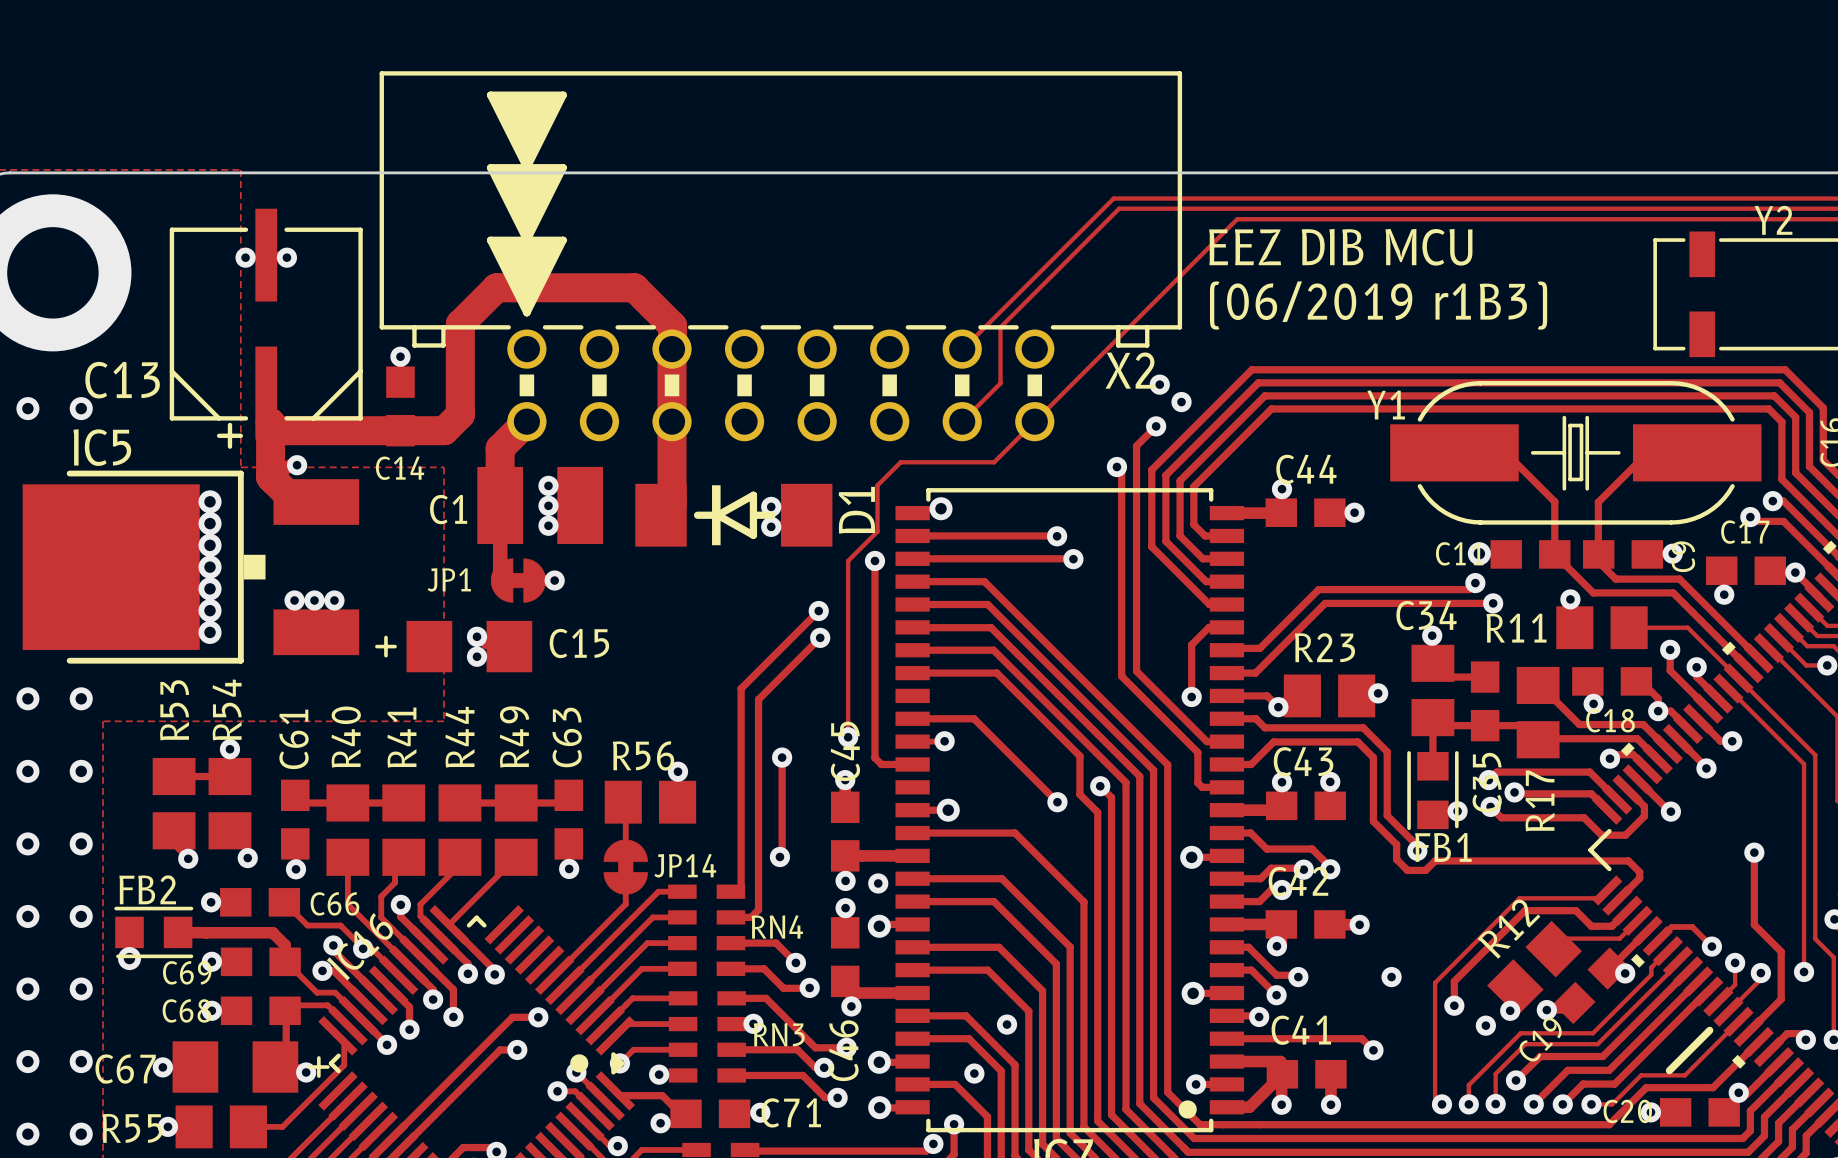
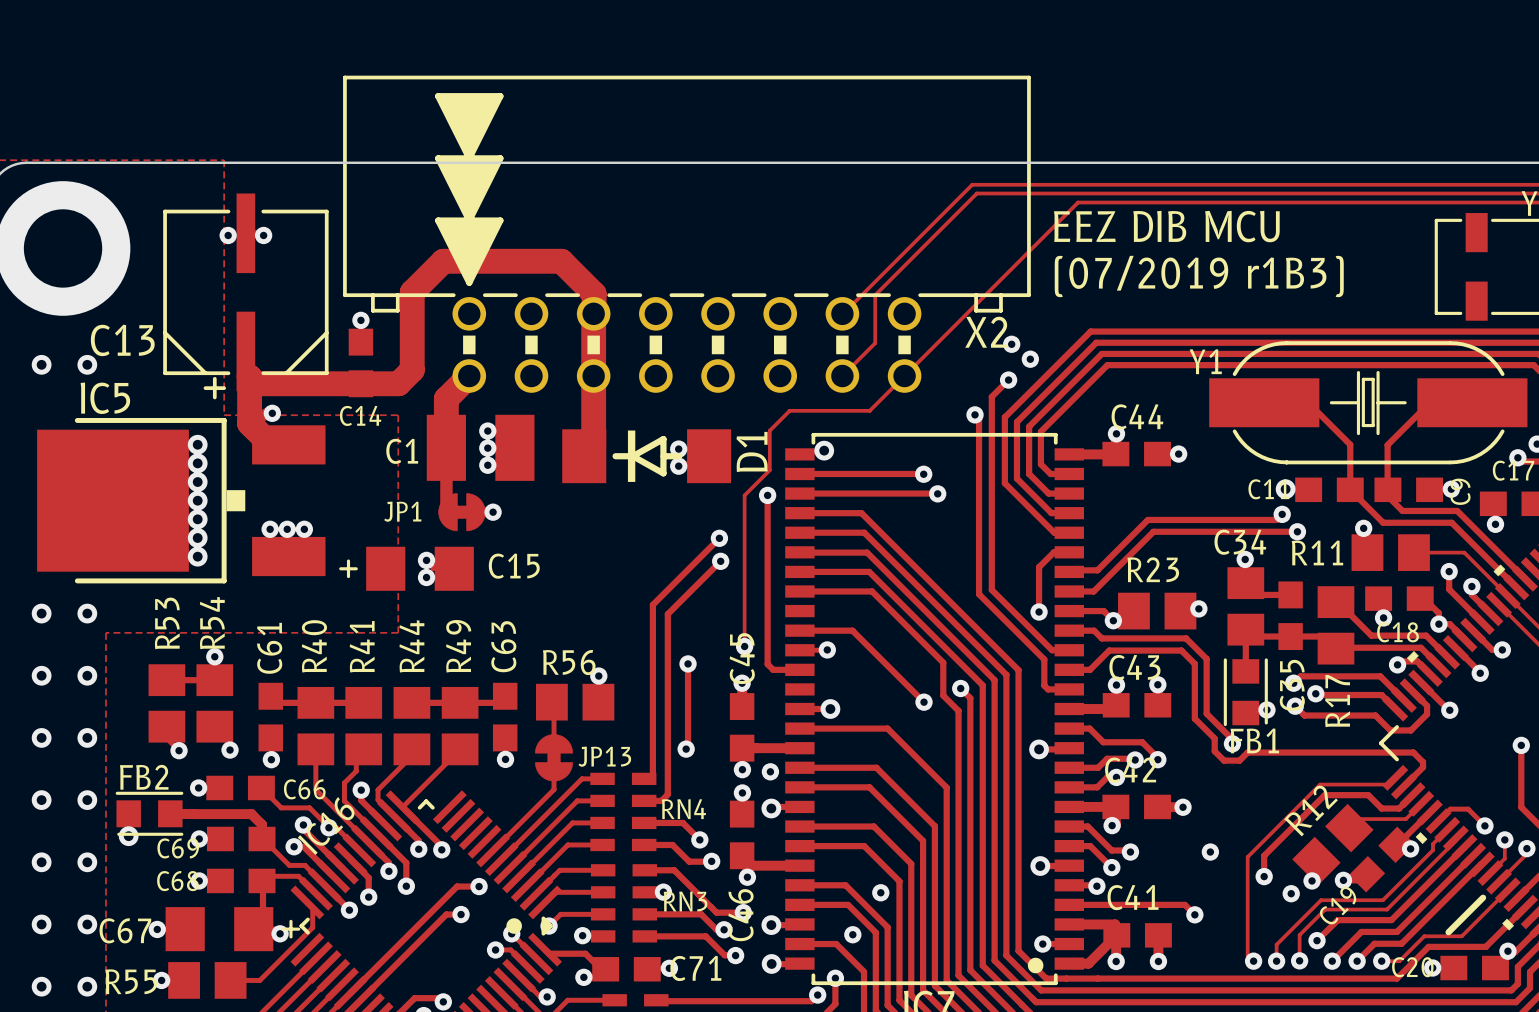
text: (06/2019 r1B3) (1378, 305) -> (07/2019 r1B3) (1199, 276)
JP14 name: JP14 (685, 865) -> JP13 (604, 756)

